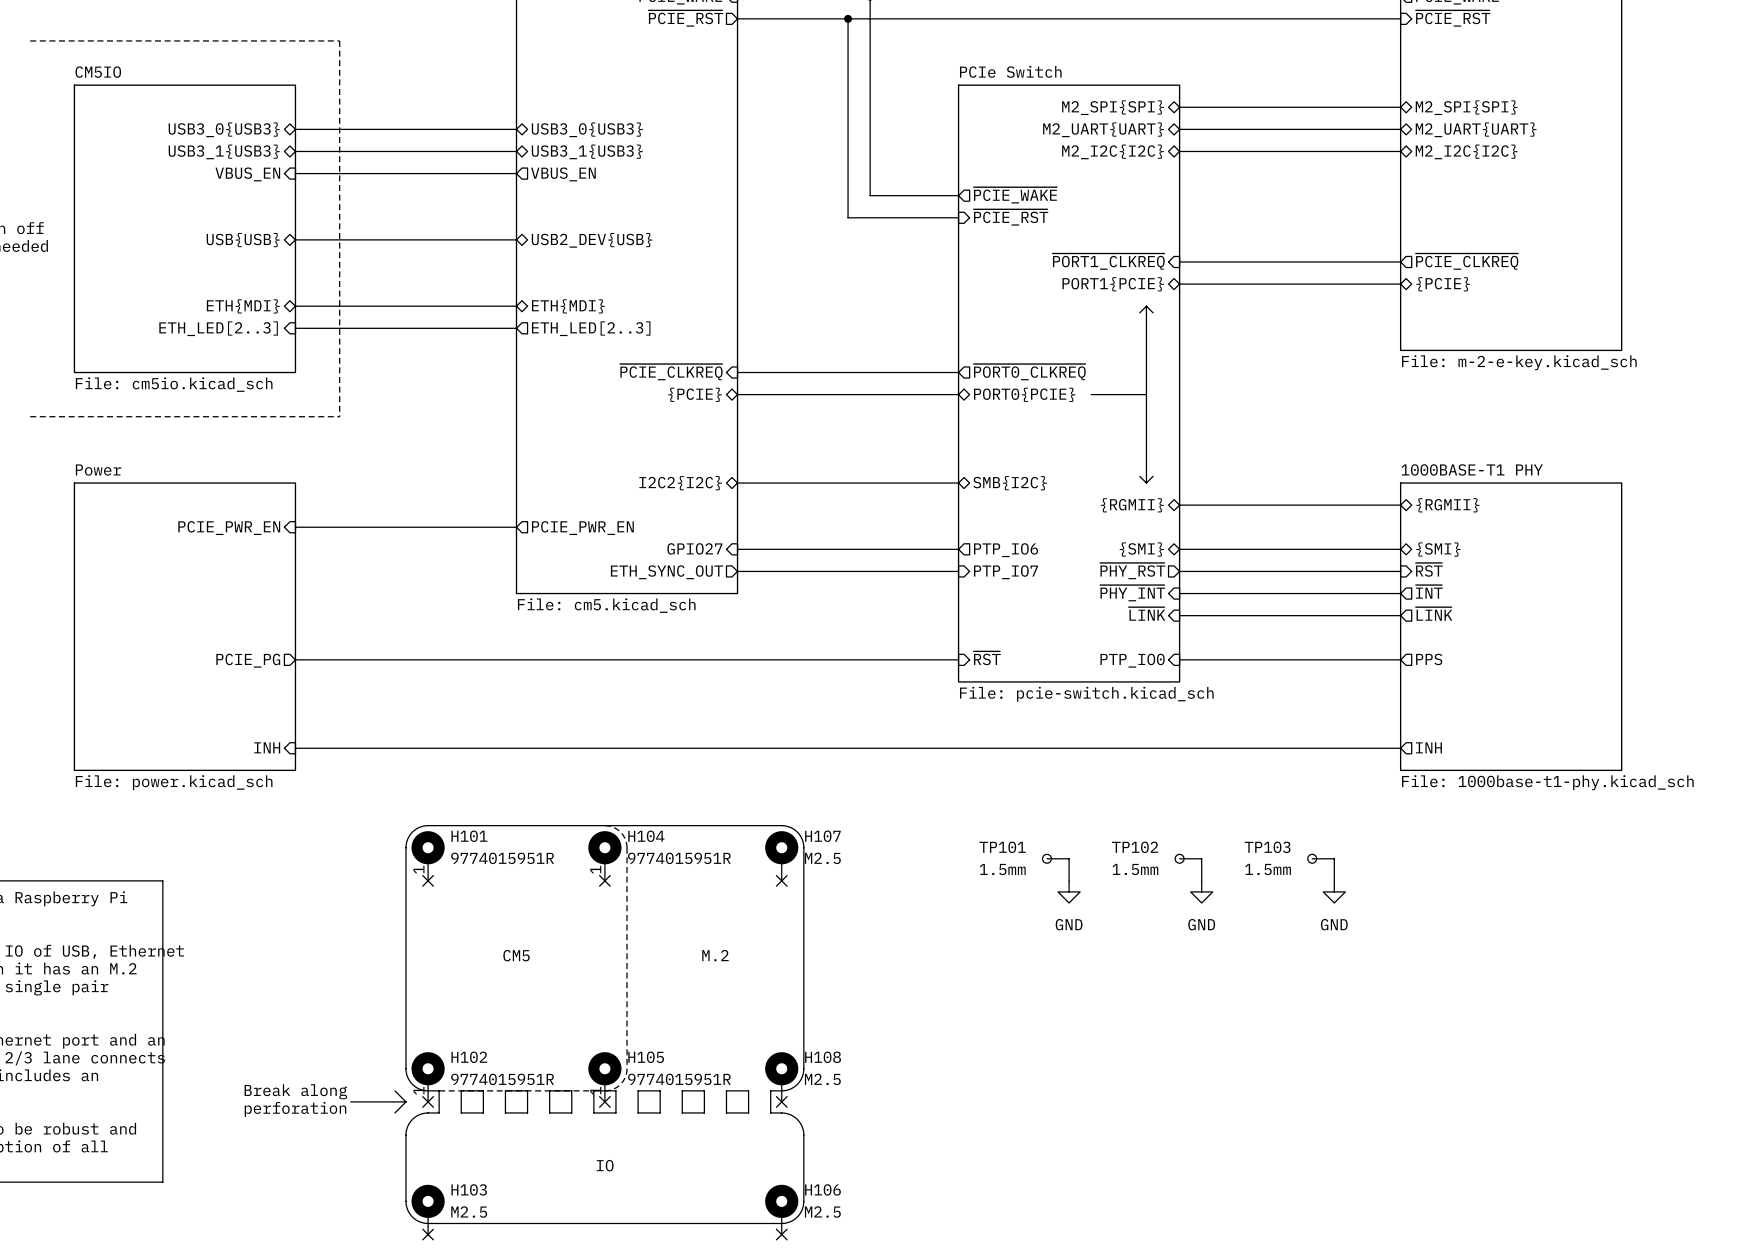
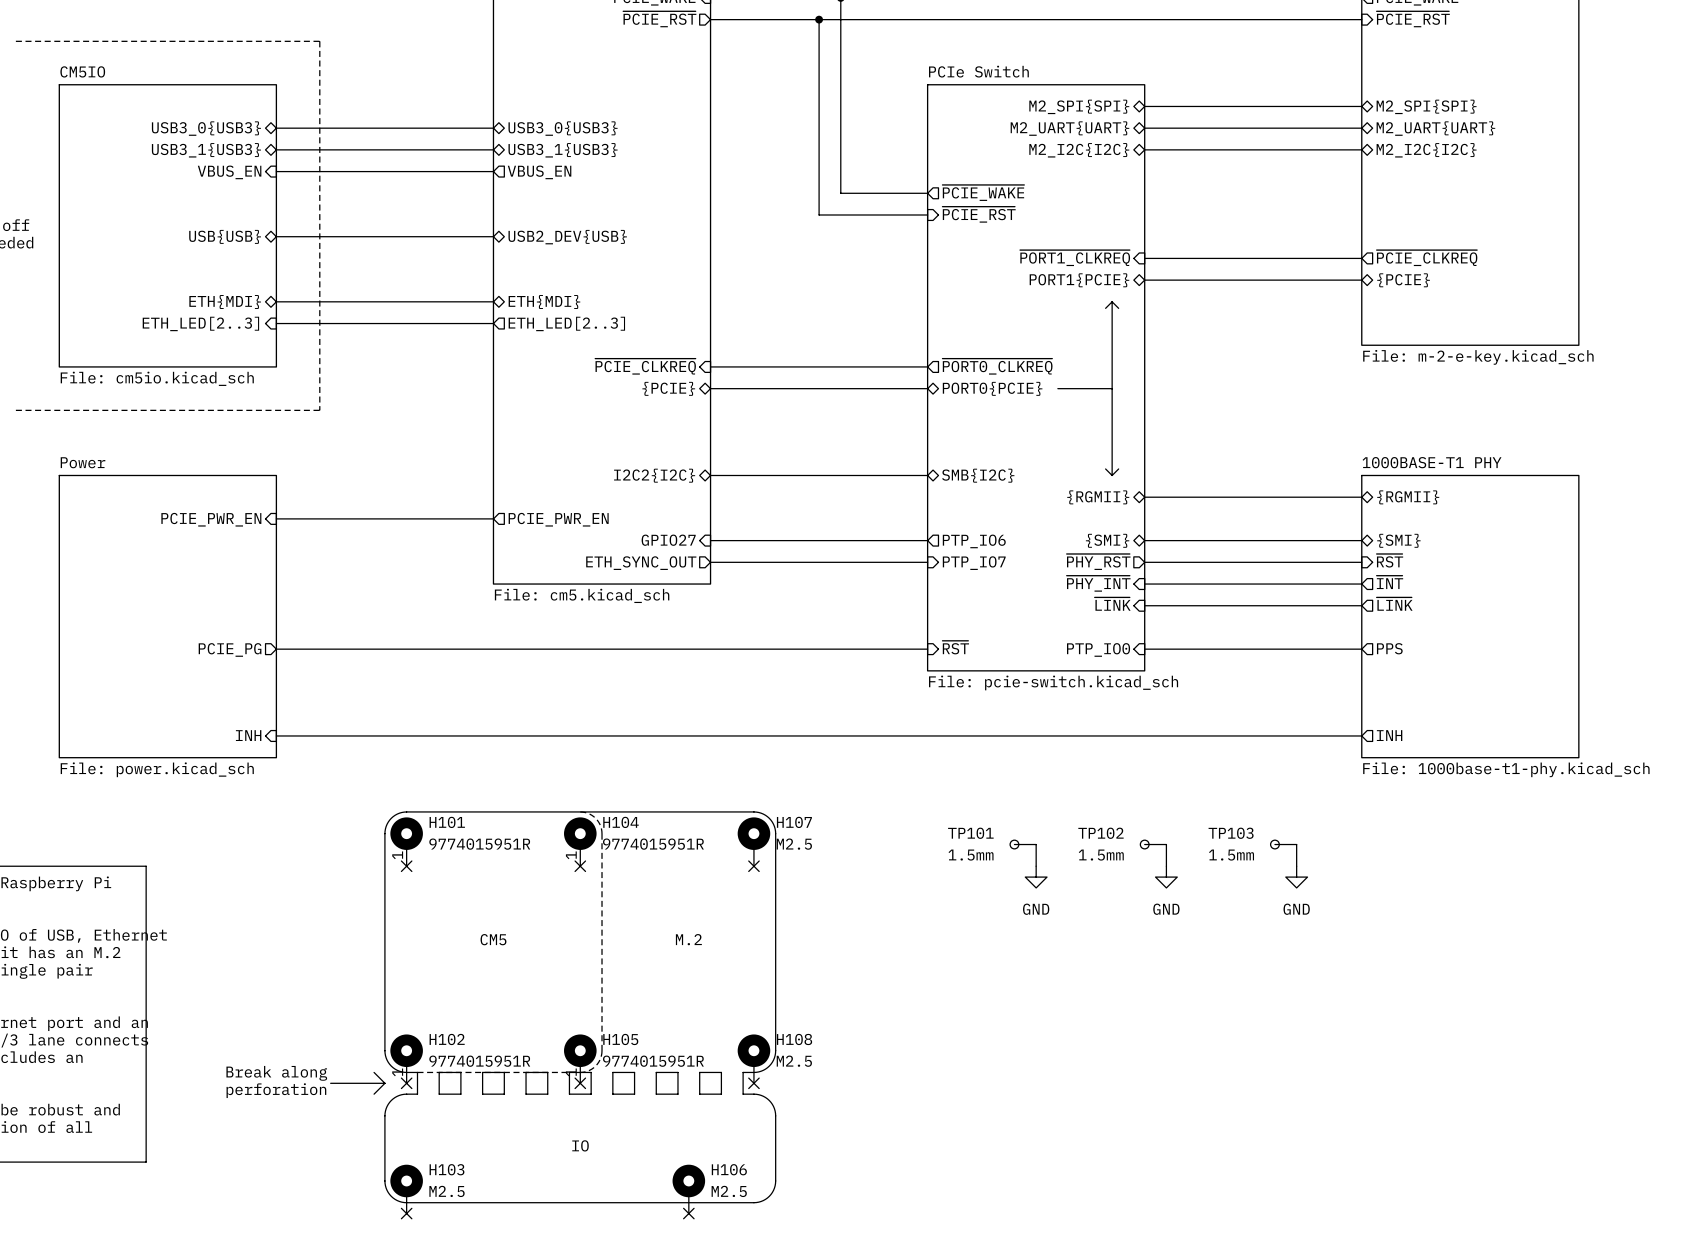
H106 position: (781, 1209) -> (688, 1189)
no-connect mark: none -> (688, 1213)
no-connect mark: (781, 1234) -> none

